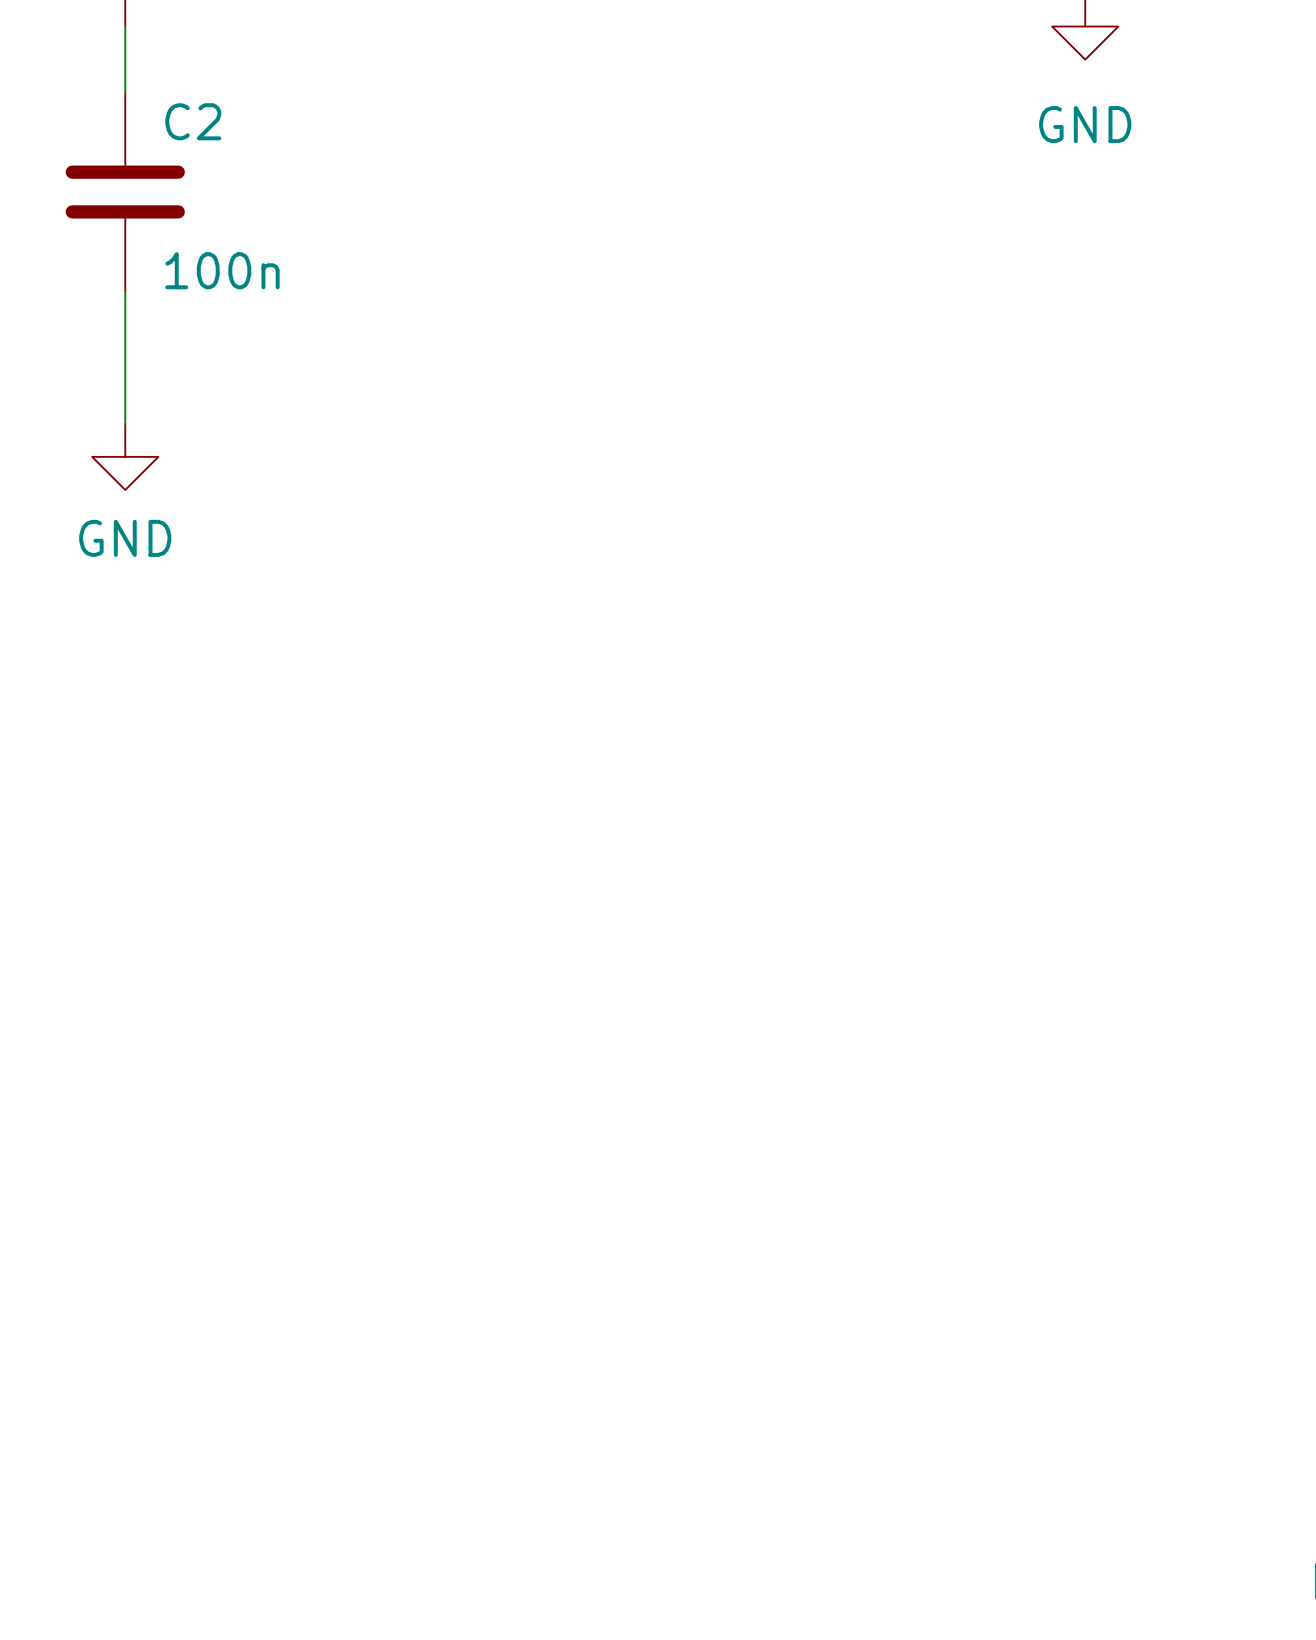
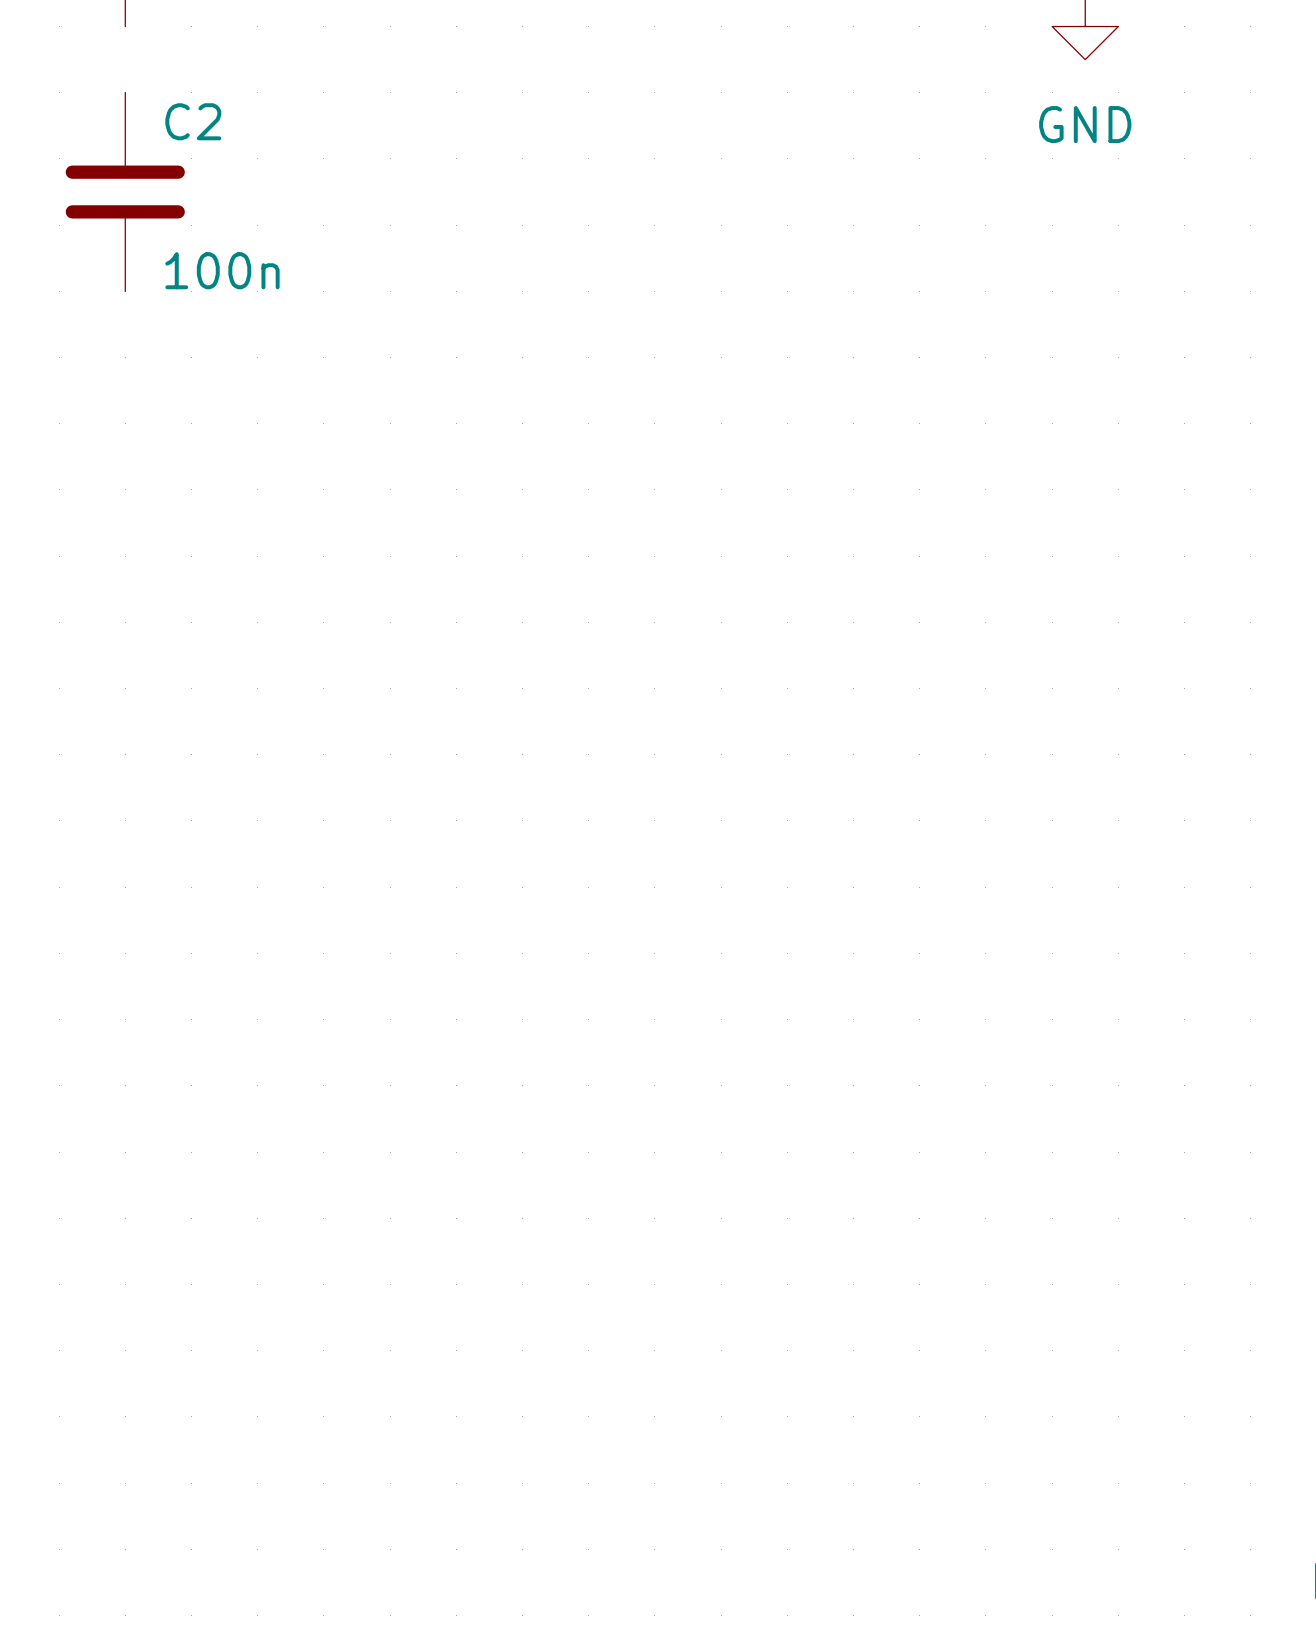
wire: (125, 26) (125, 92) -> none
wire: (125, 291) (125, 423) -> none
power symbol: GND (125, 456) -> none

